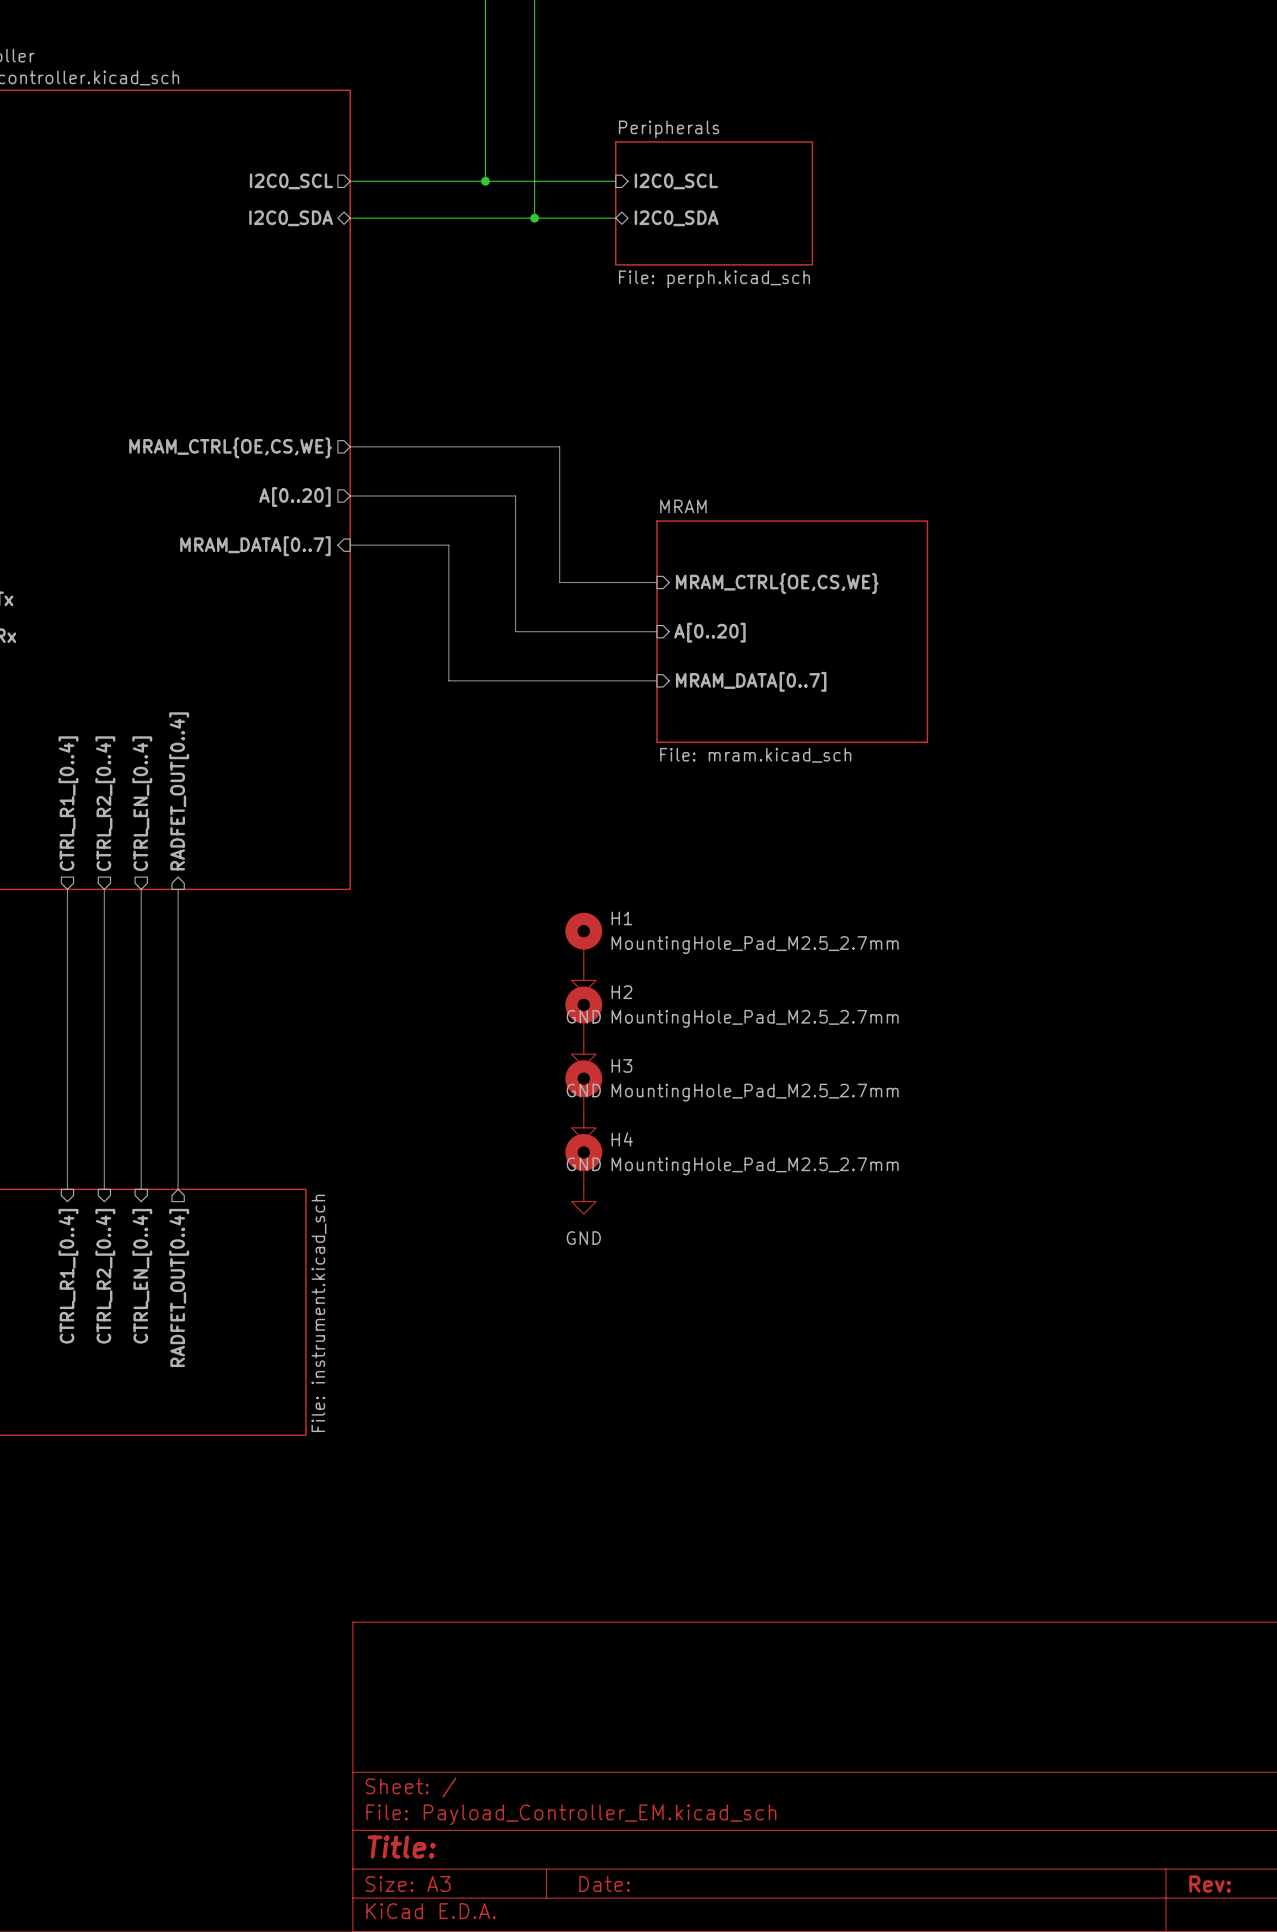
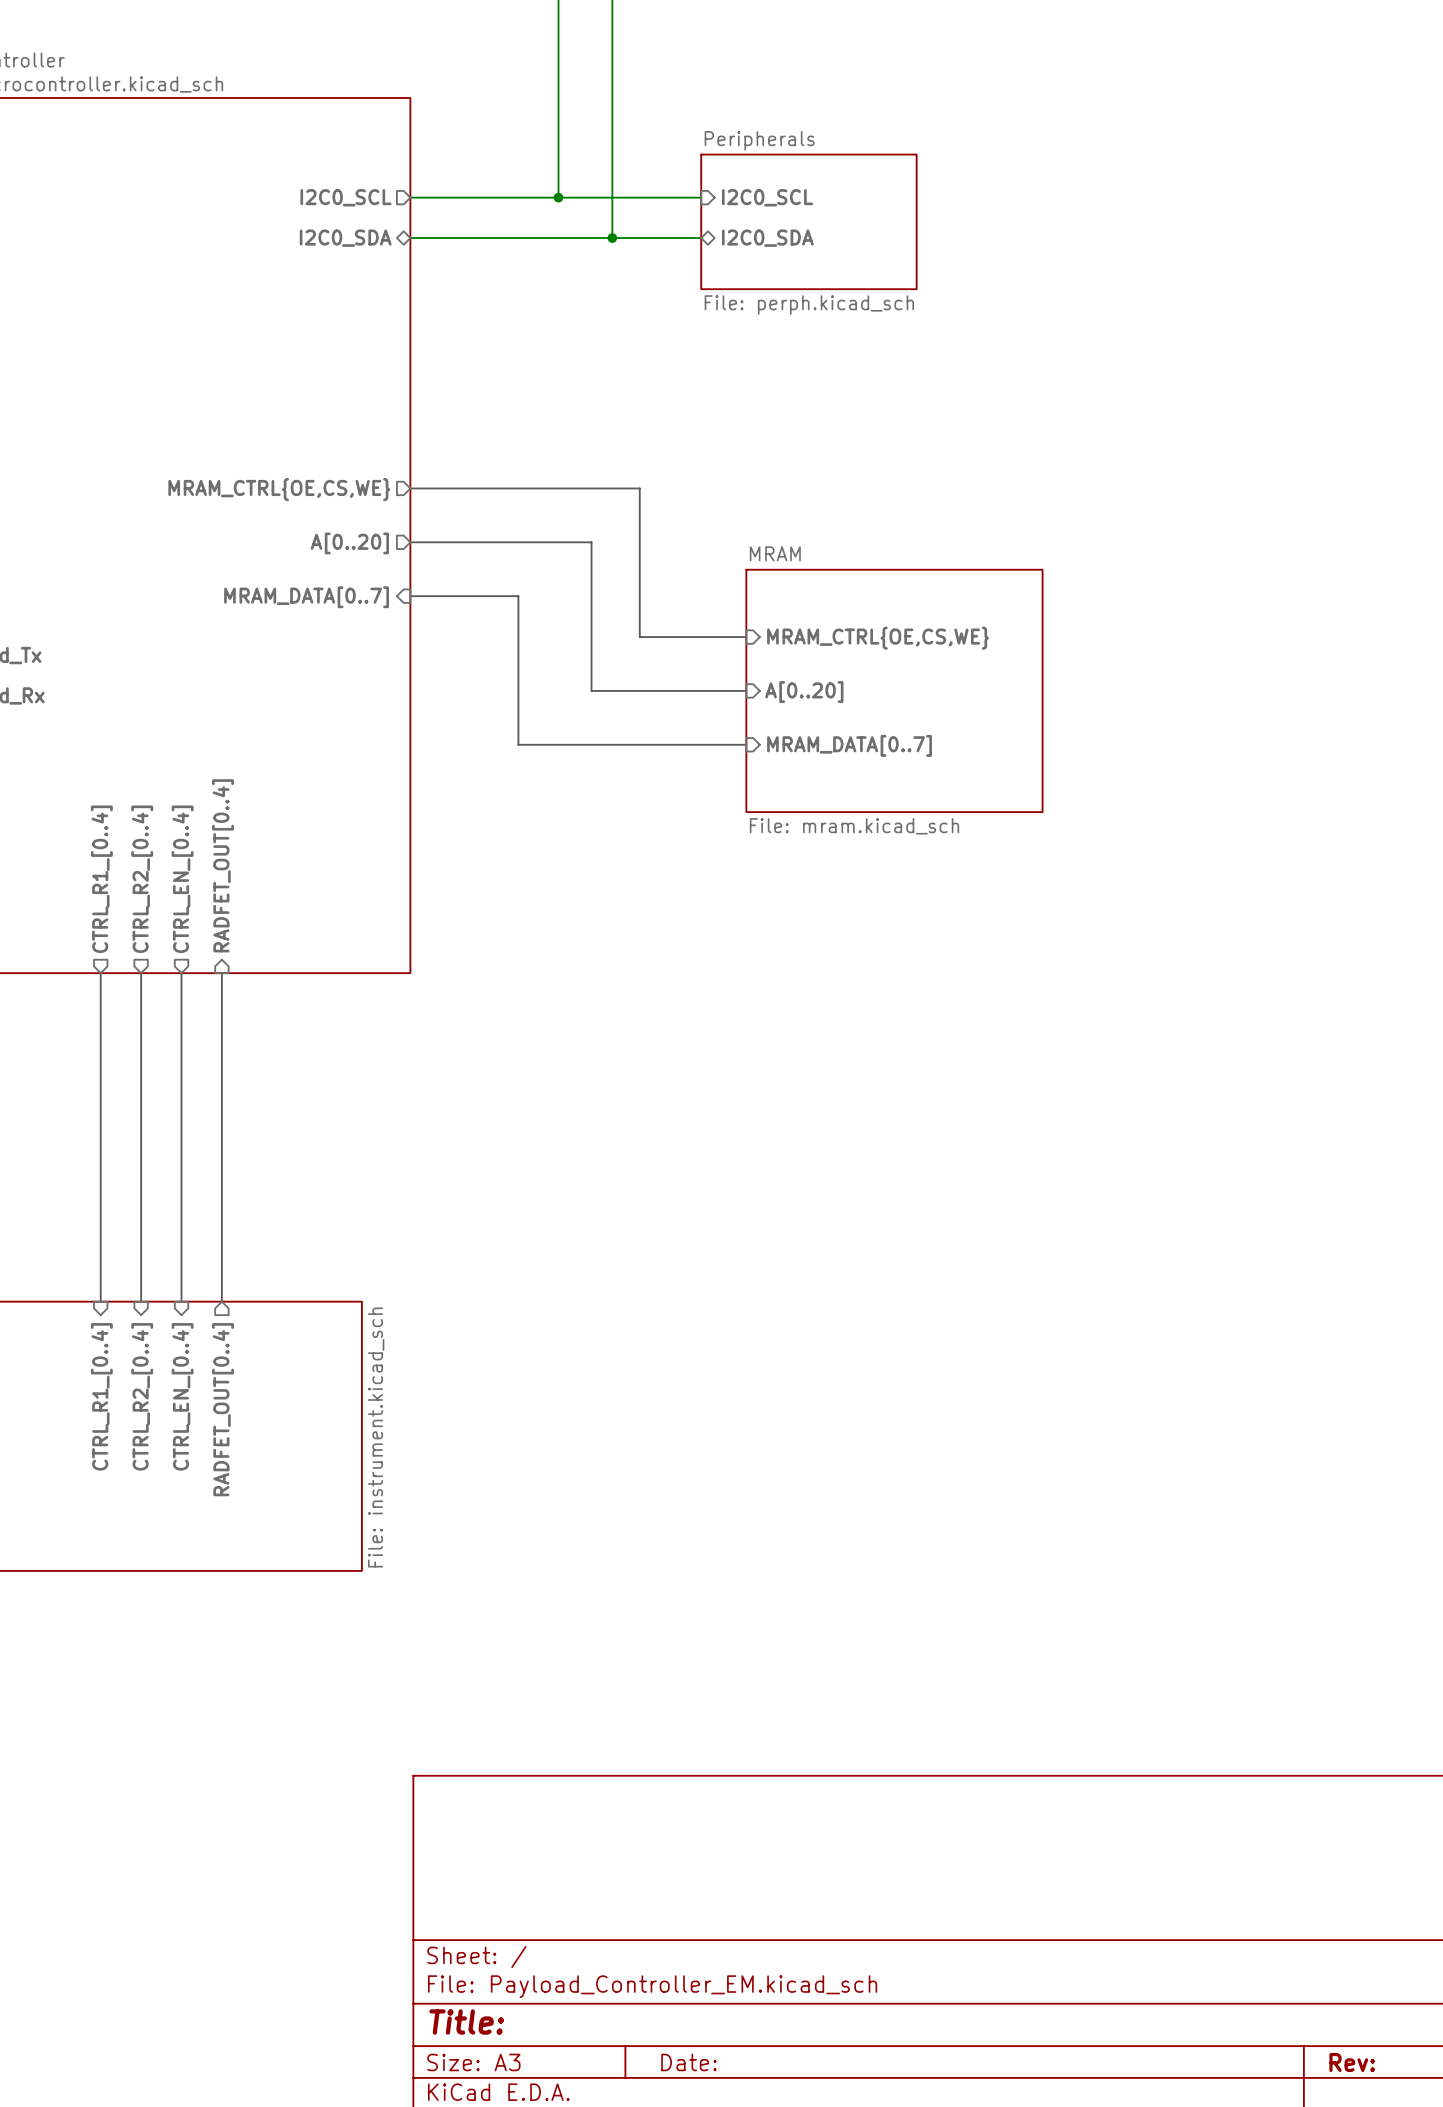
H1: MountingHole_Pad_M2.5_2.7mm (583, 940) -> none
power symbol: GND (583, 980) -> none
H2: MountingHole_Pad_M2.5_2.7mm (583, 1014) -> none
power symbol: GND (583, 1054) -> none
H3: MountingHole_Pad_M2.5_2.7mm (583, 1087) -> none
power symbol: GND (583, 1127) -> none
H4: MountingHole_Pad_M2.5_2.7mm (583, 1161) -> none
power symbol: GND (583, 1201) -> none

